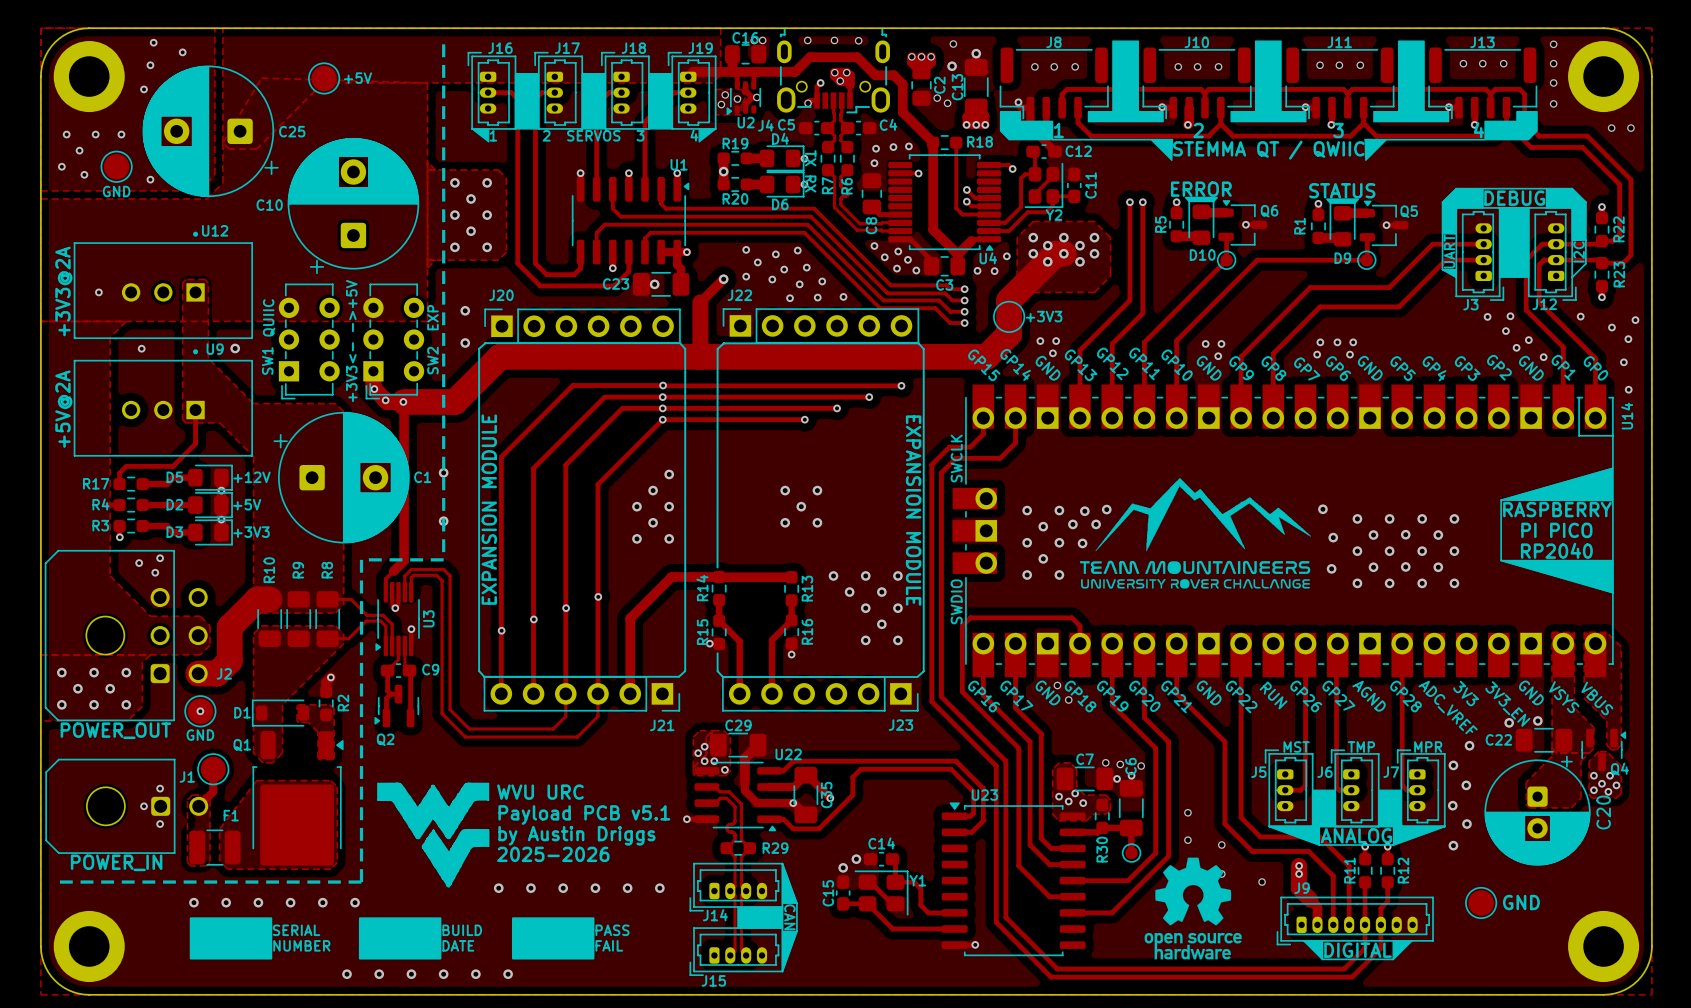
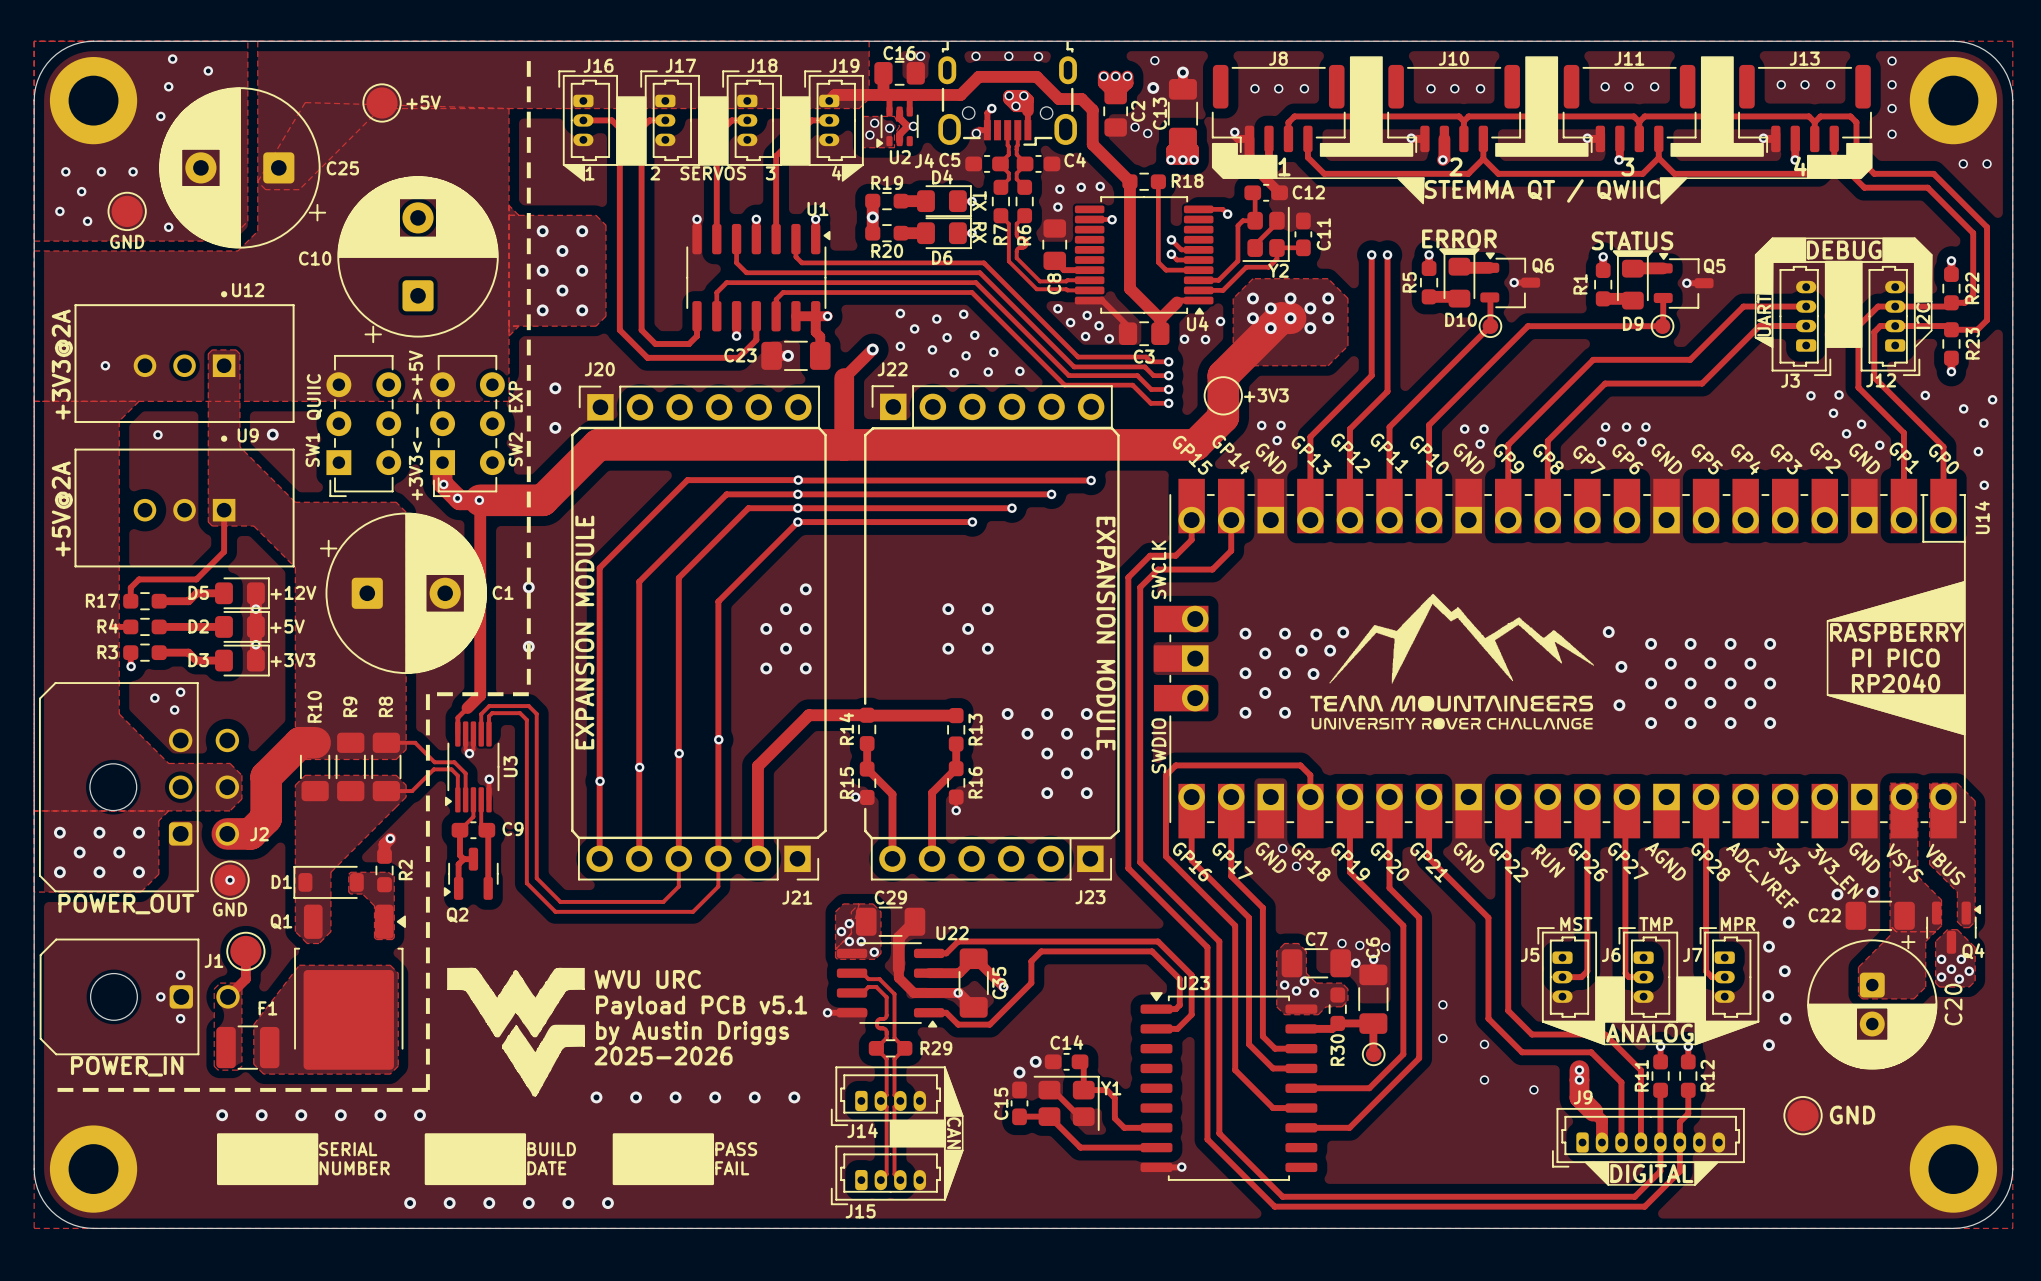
drawing: [1144, 857, 1242, 960] -> none

